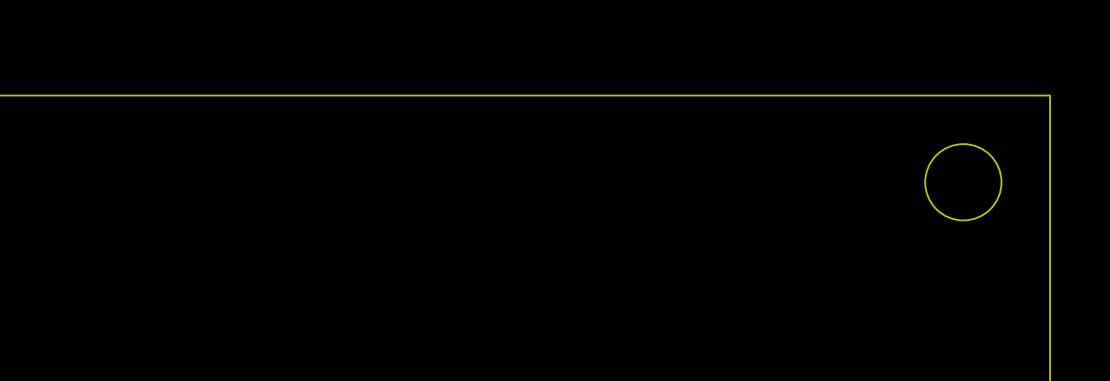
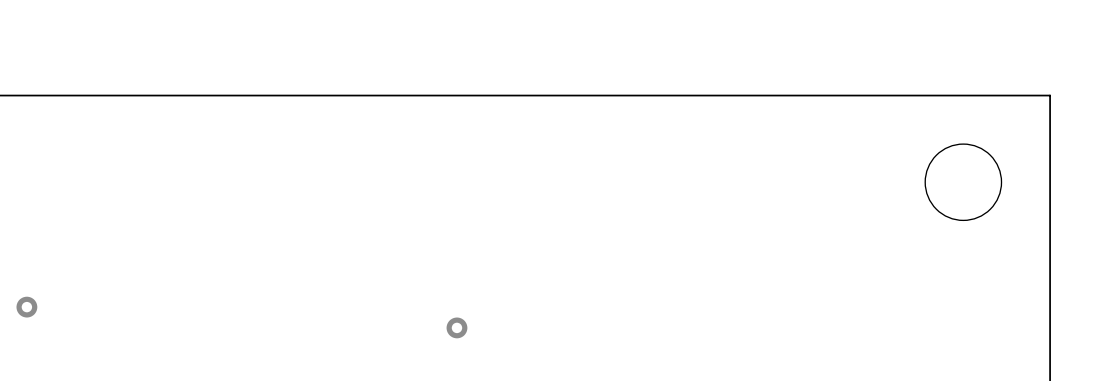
via: none -> (26, 307)
via: none -> (456, 327)

